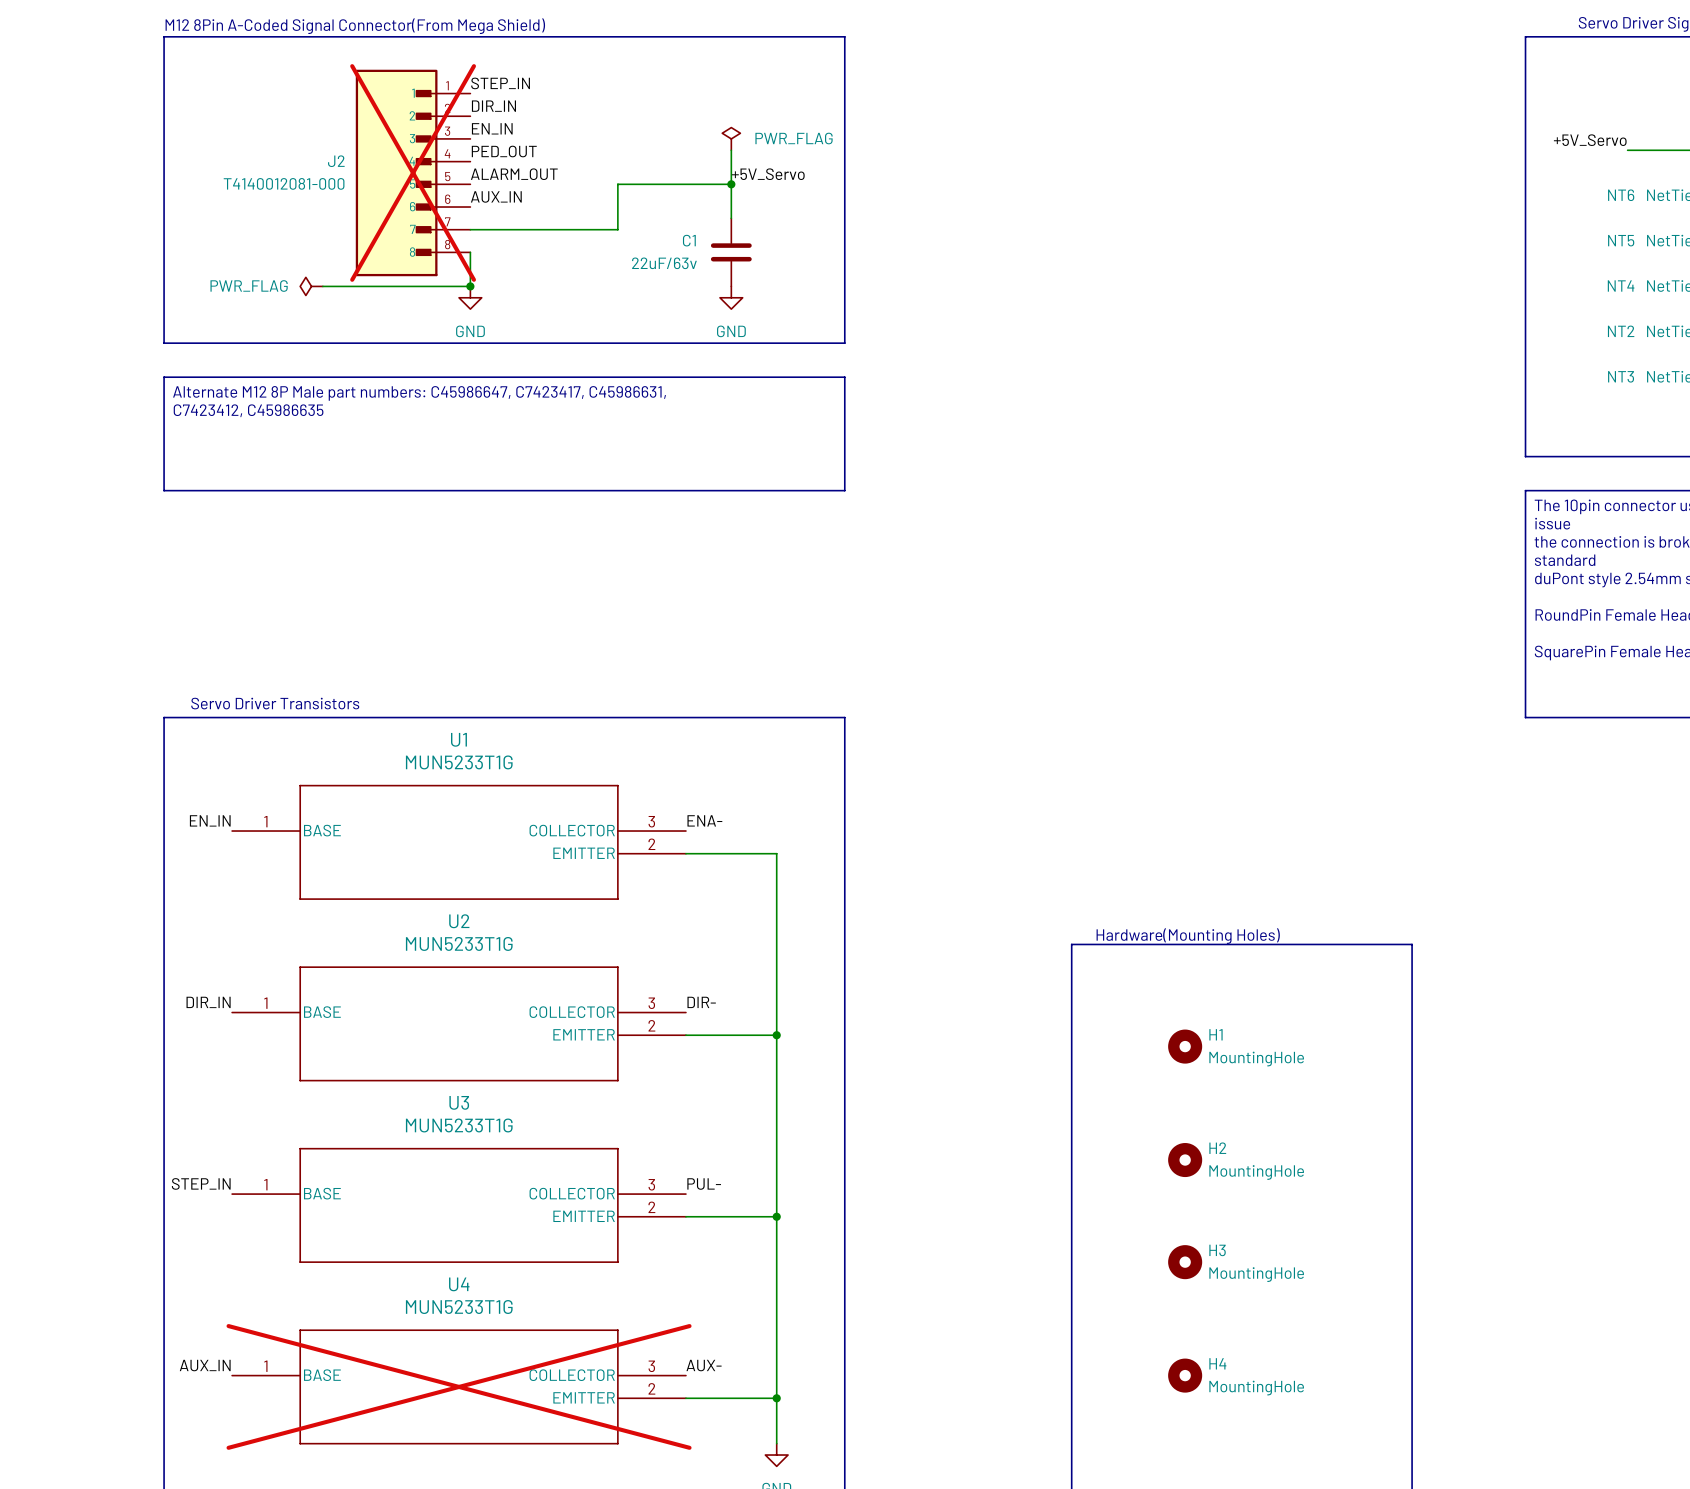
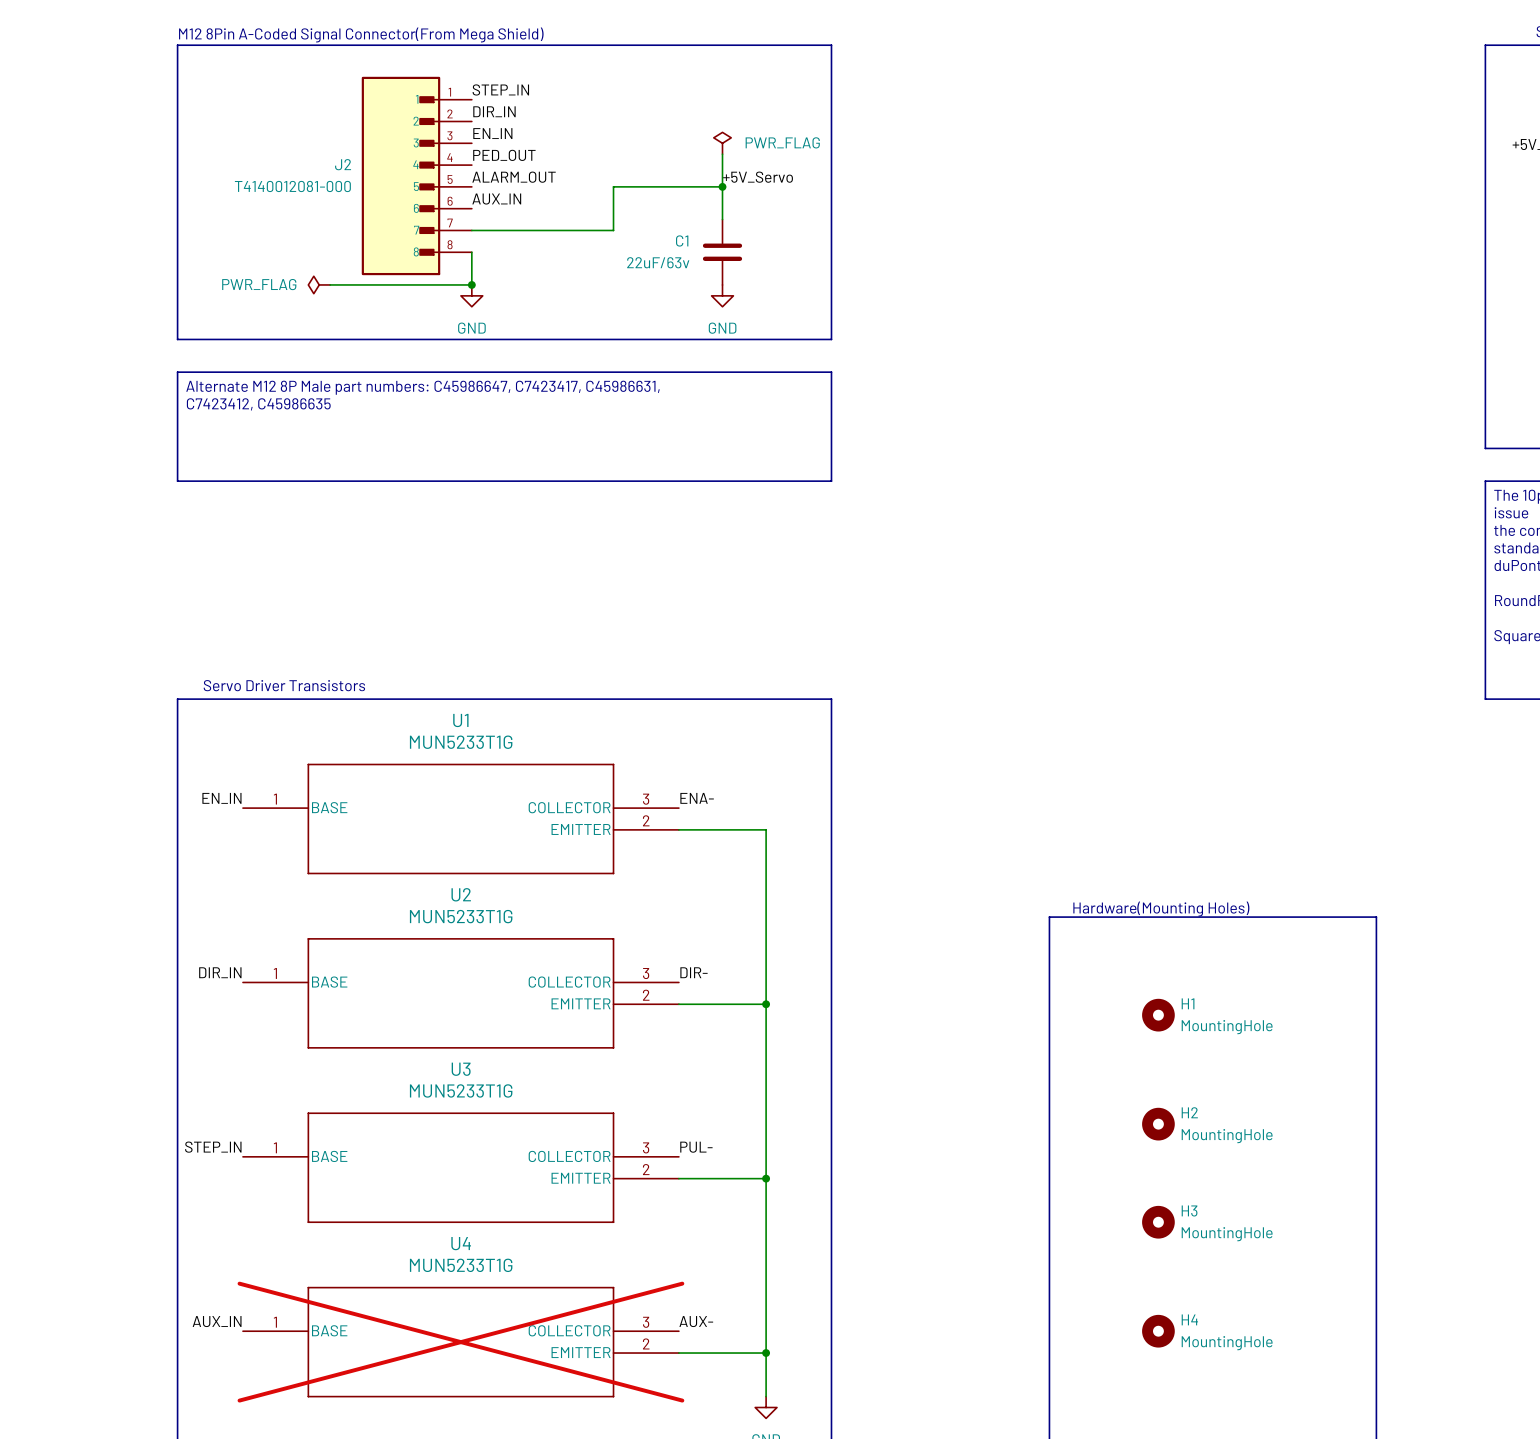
J2 do-not-place cross: (413, 172) -> none

